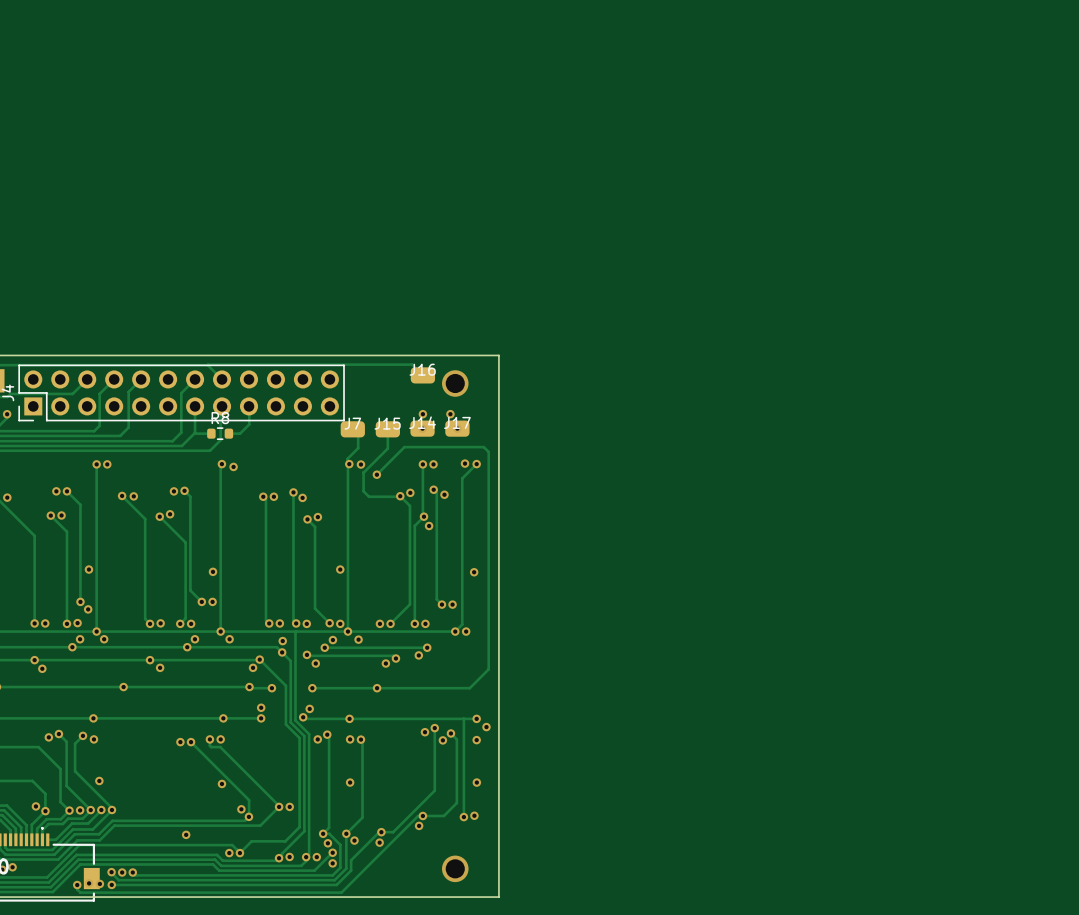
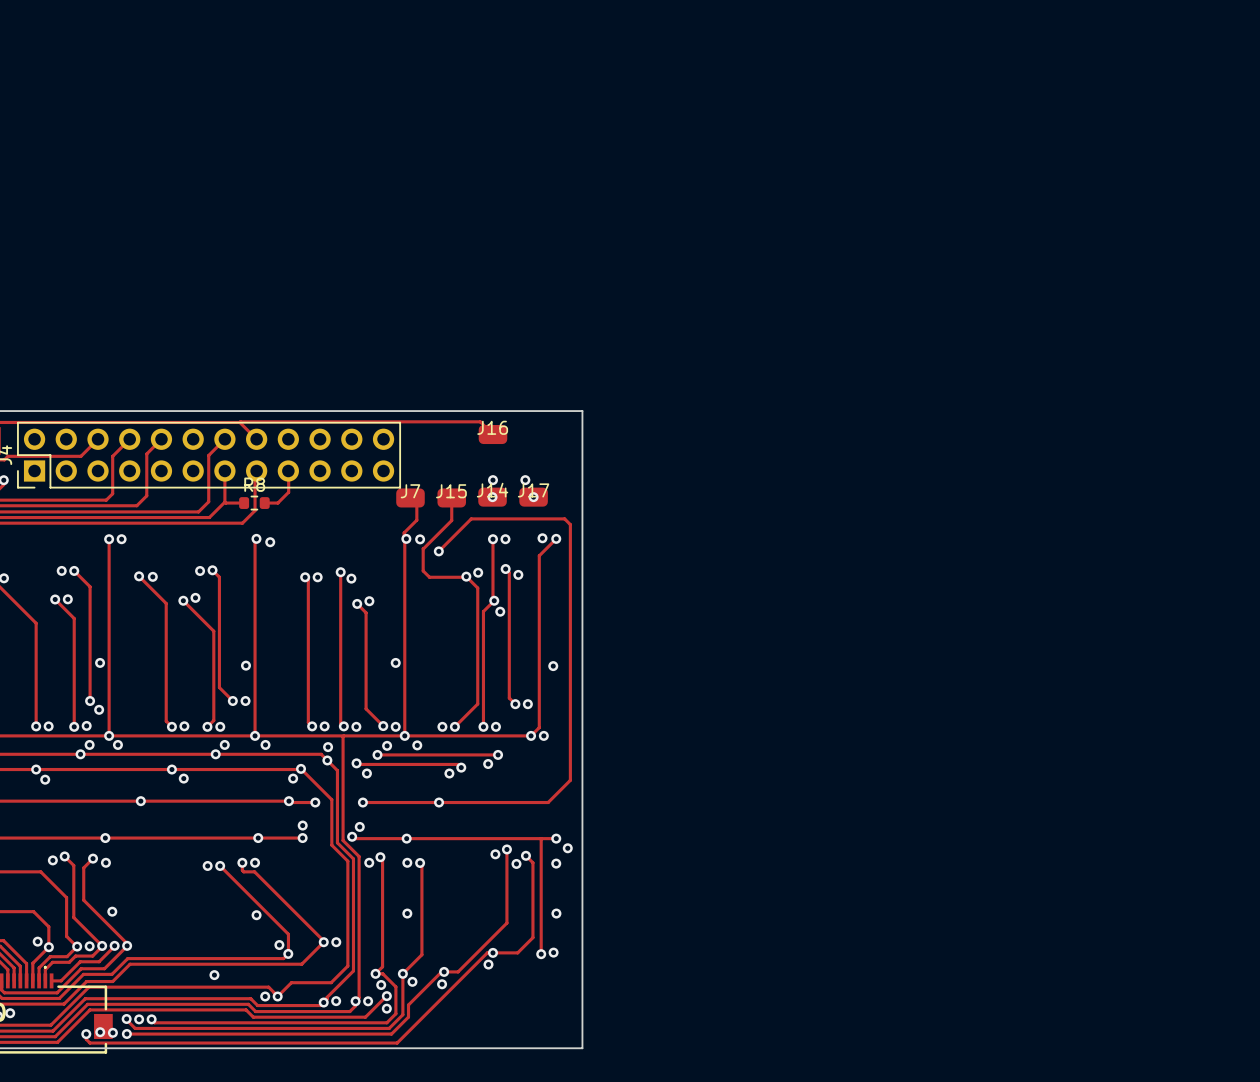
via: (455, 383) -> none
via: (455, 868) -> none

